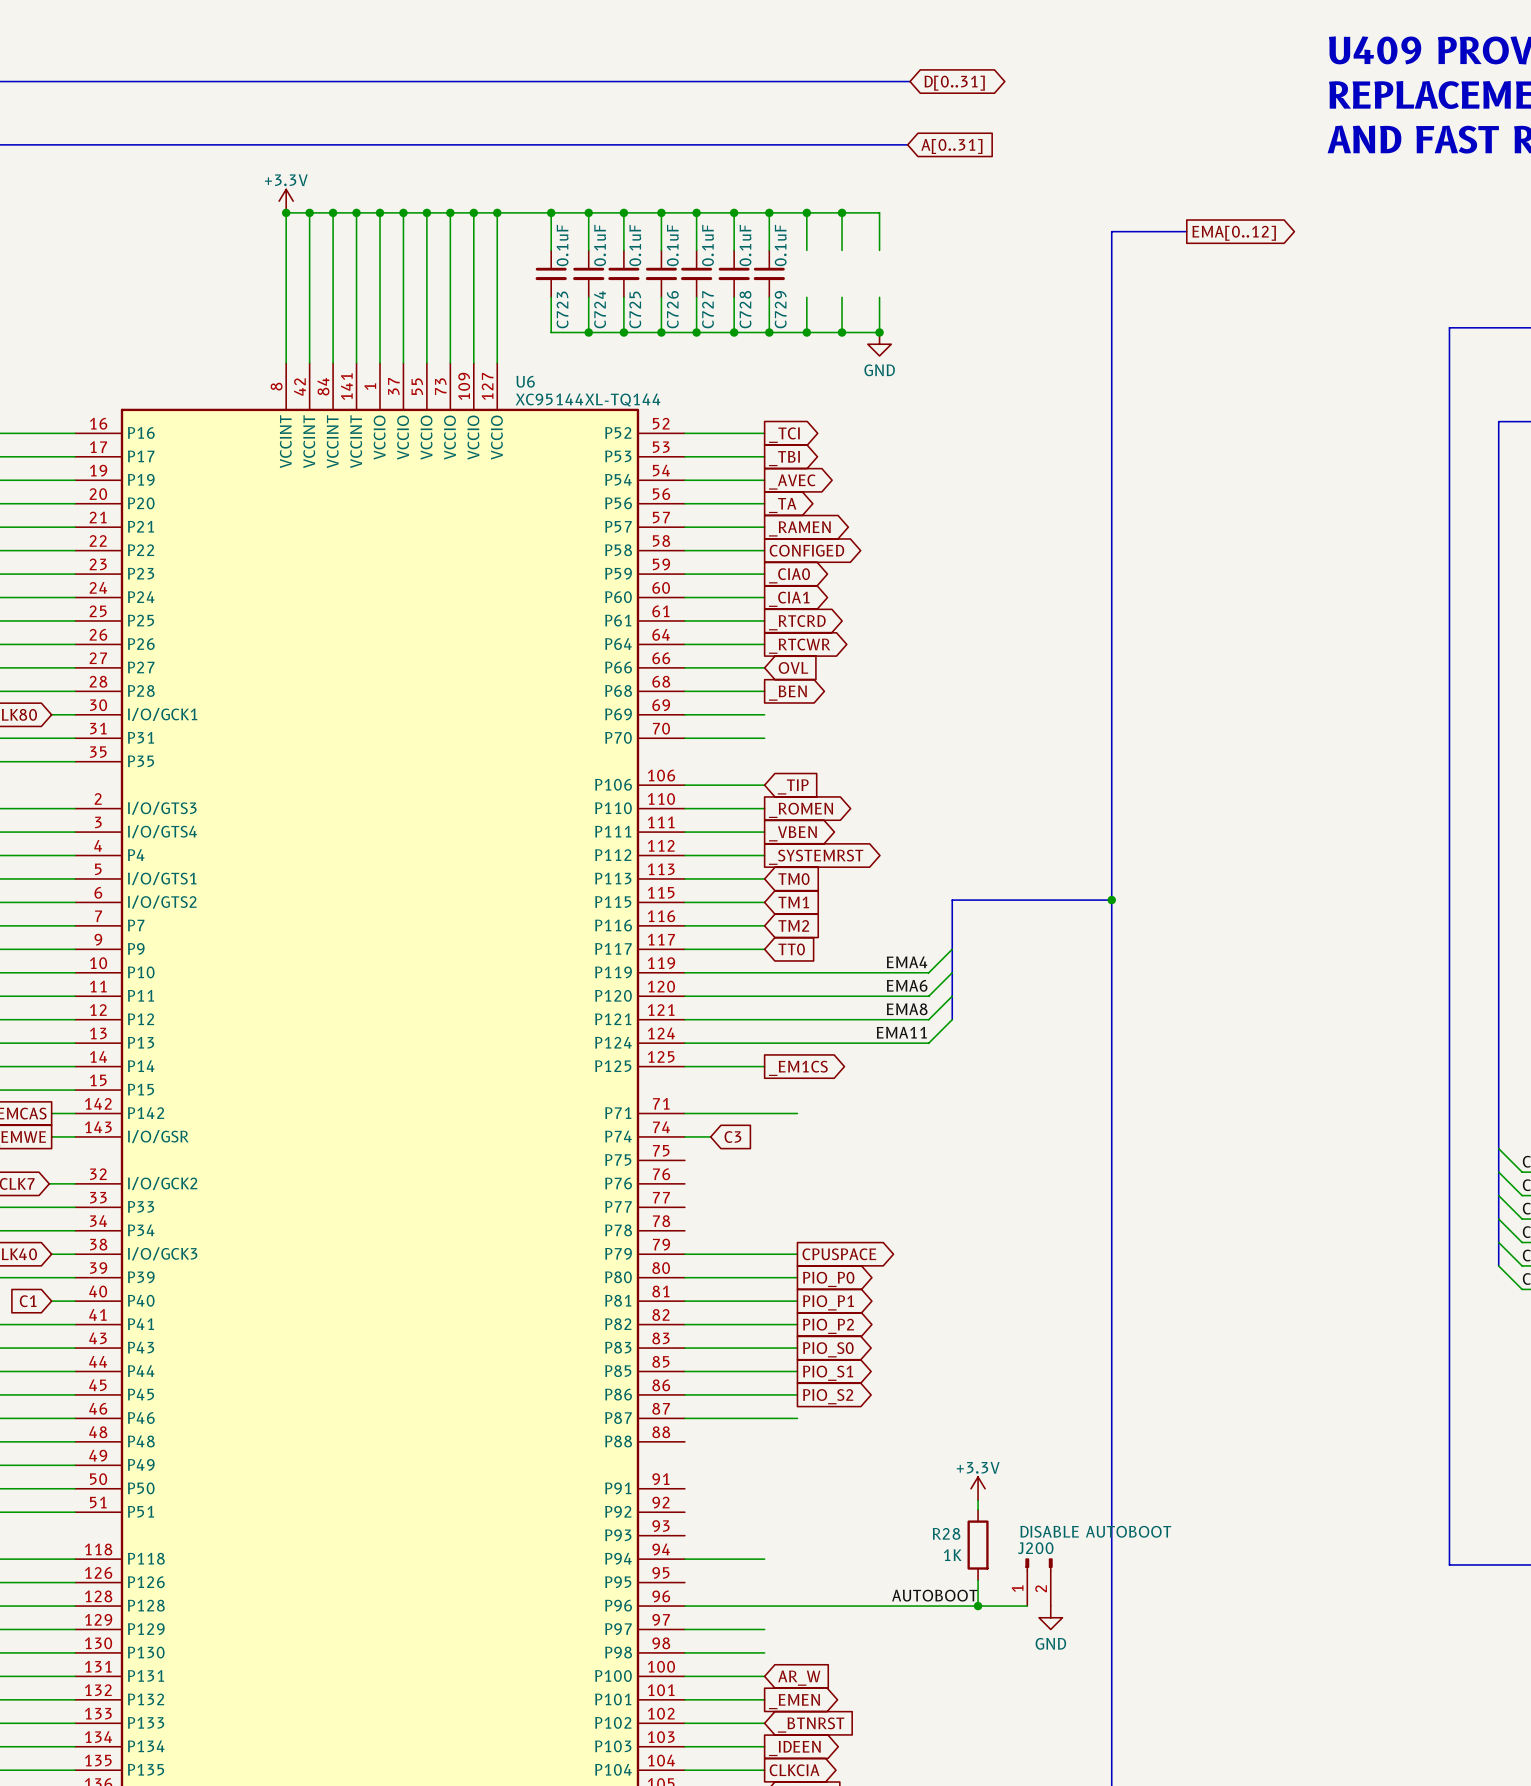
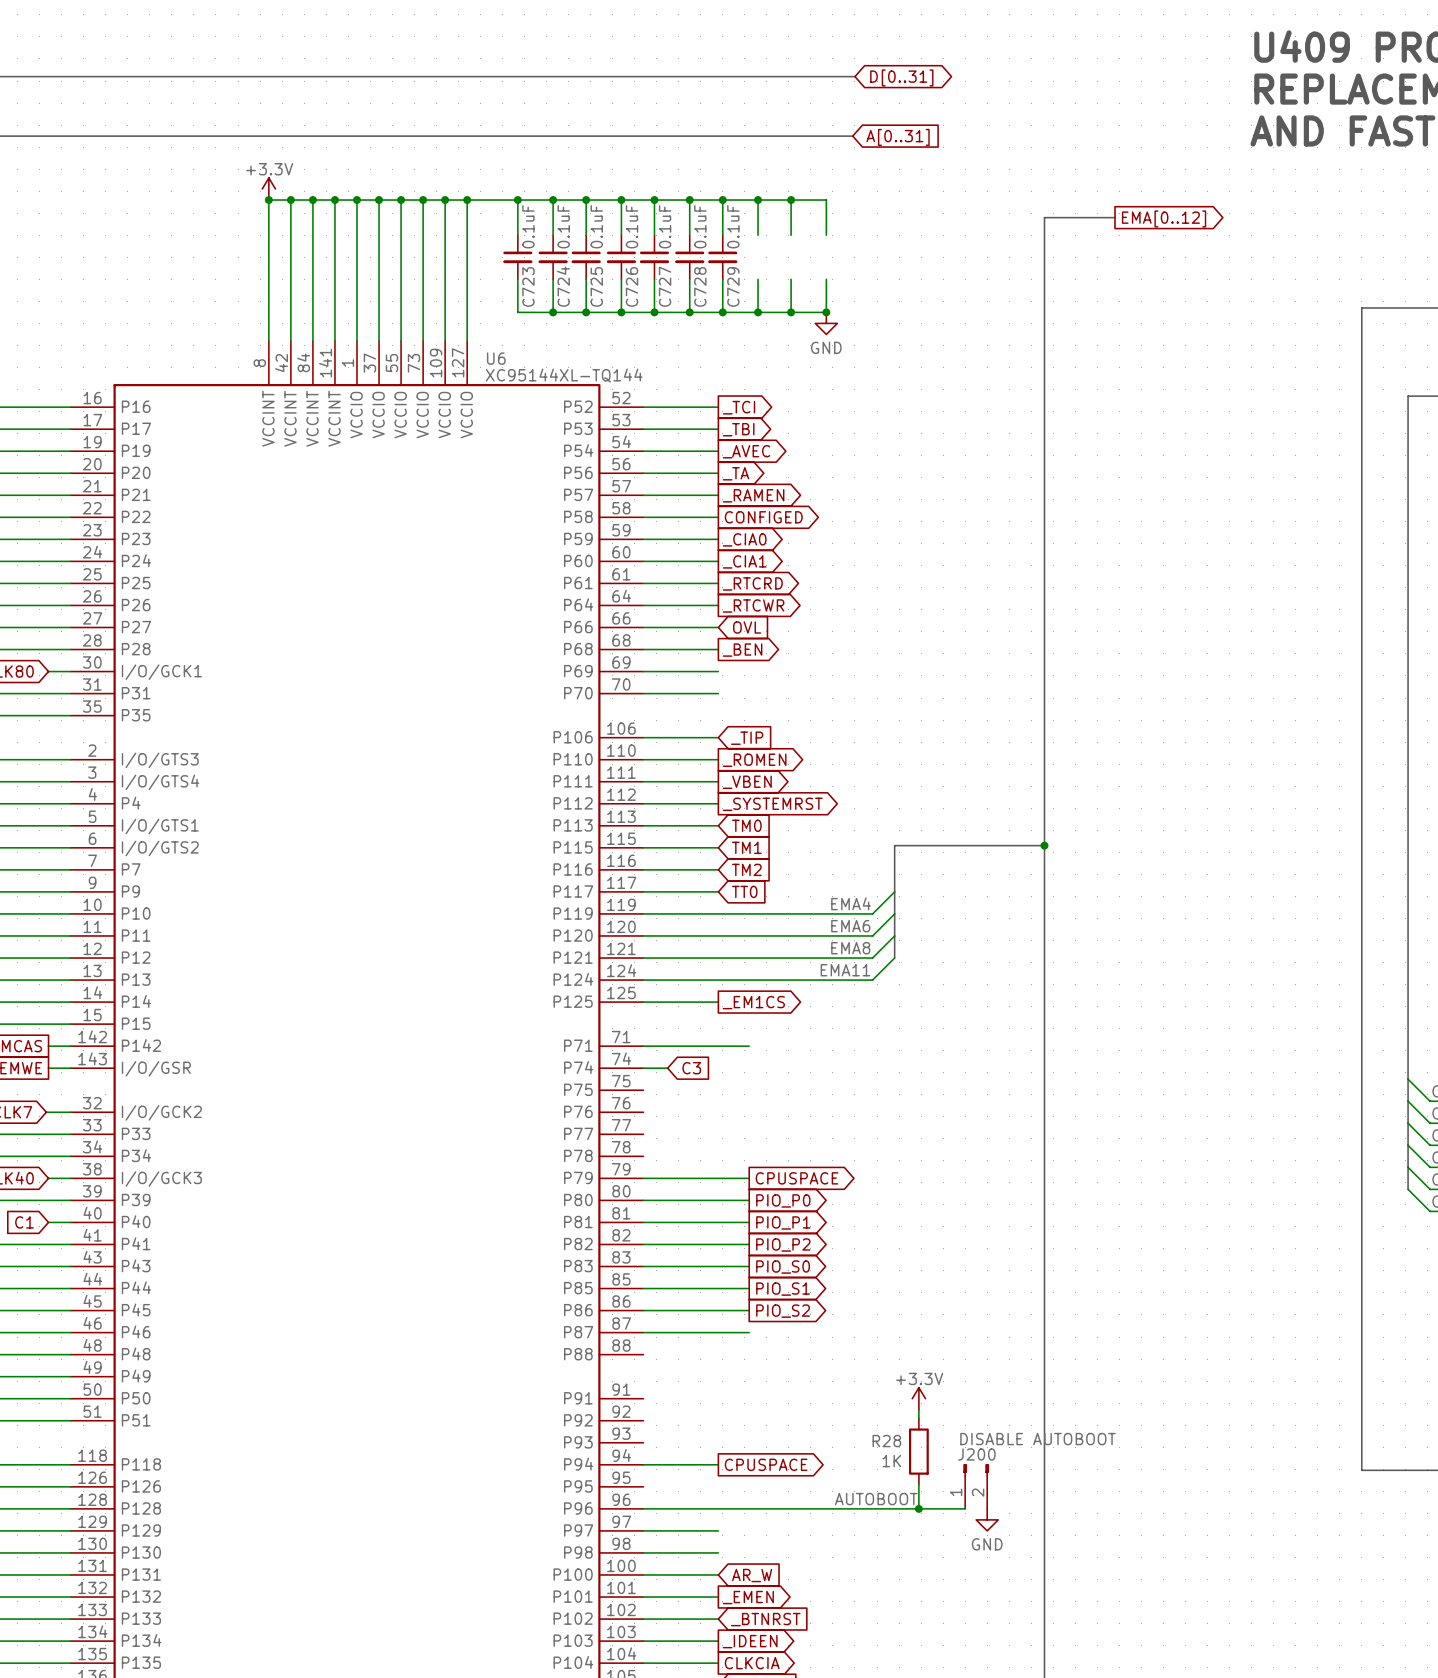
global label: none -> CPUSPACE (766, 1464)

